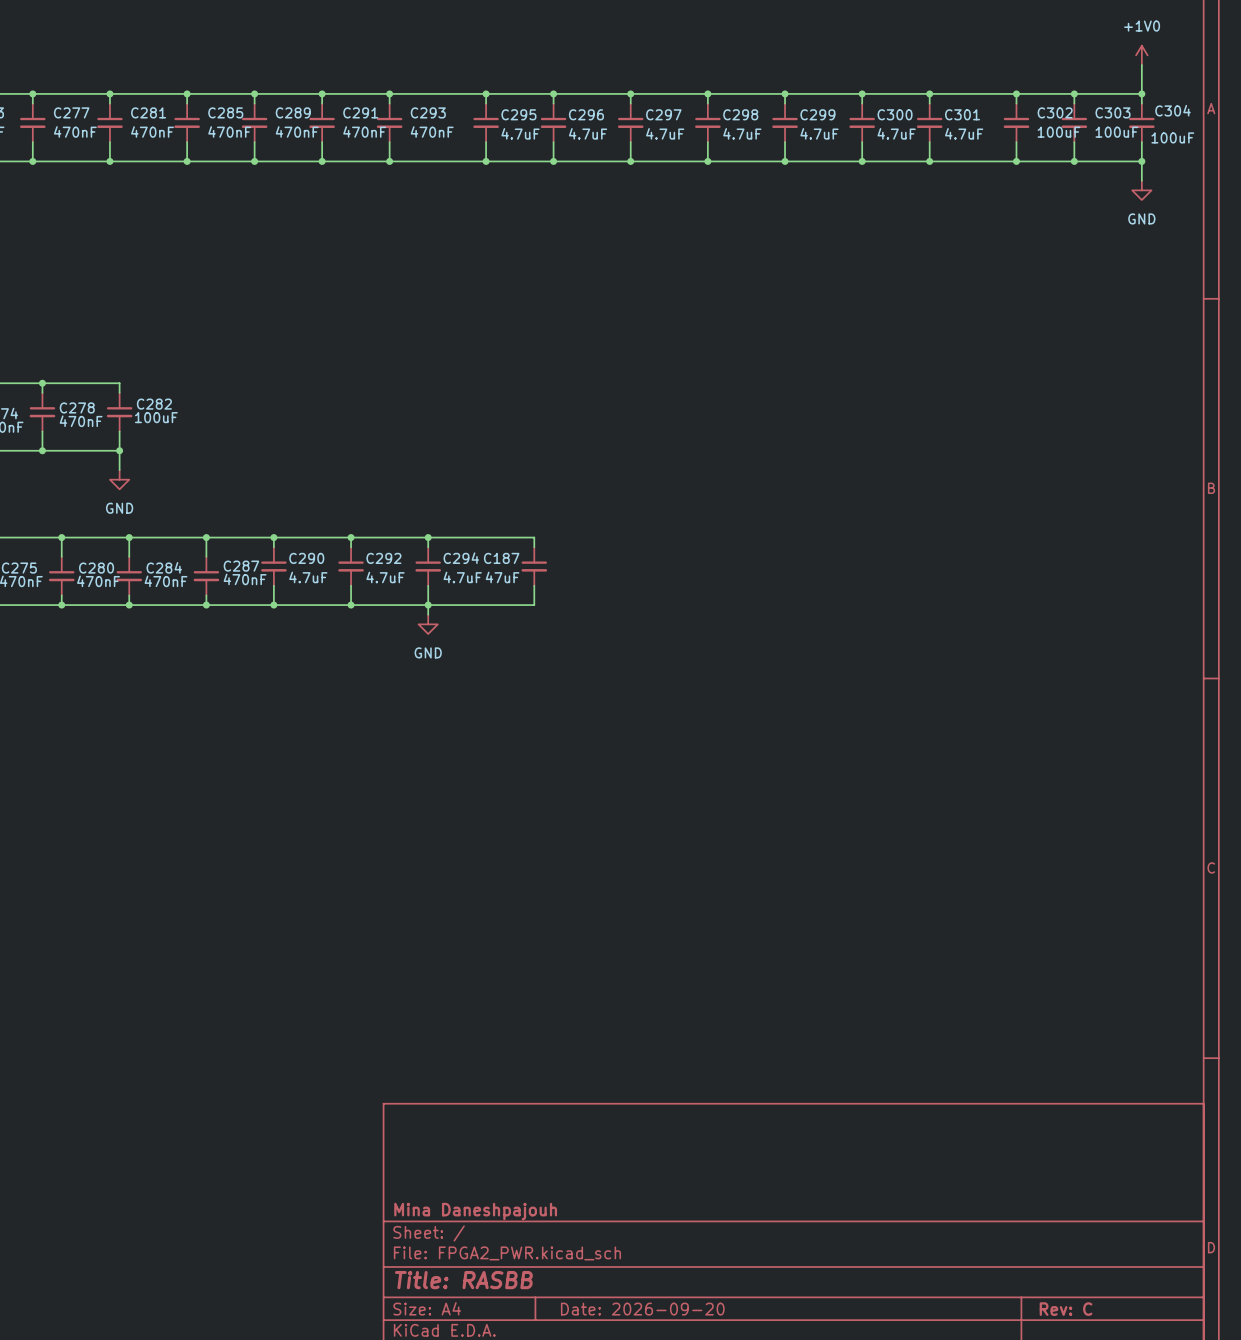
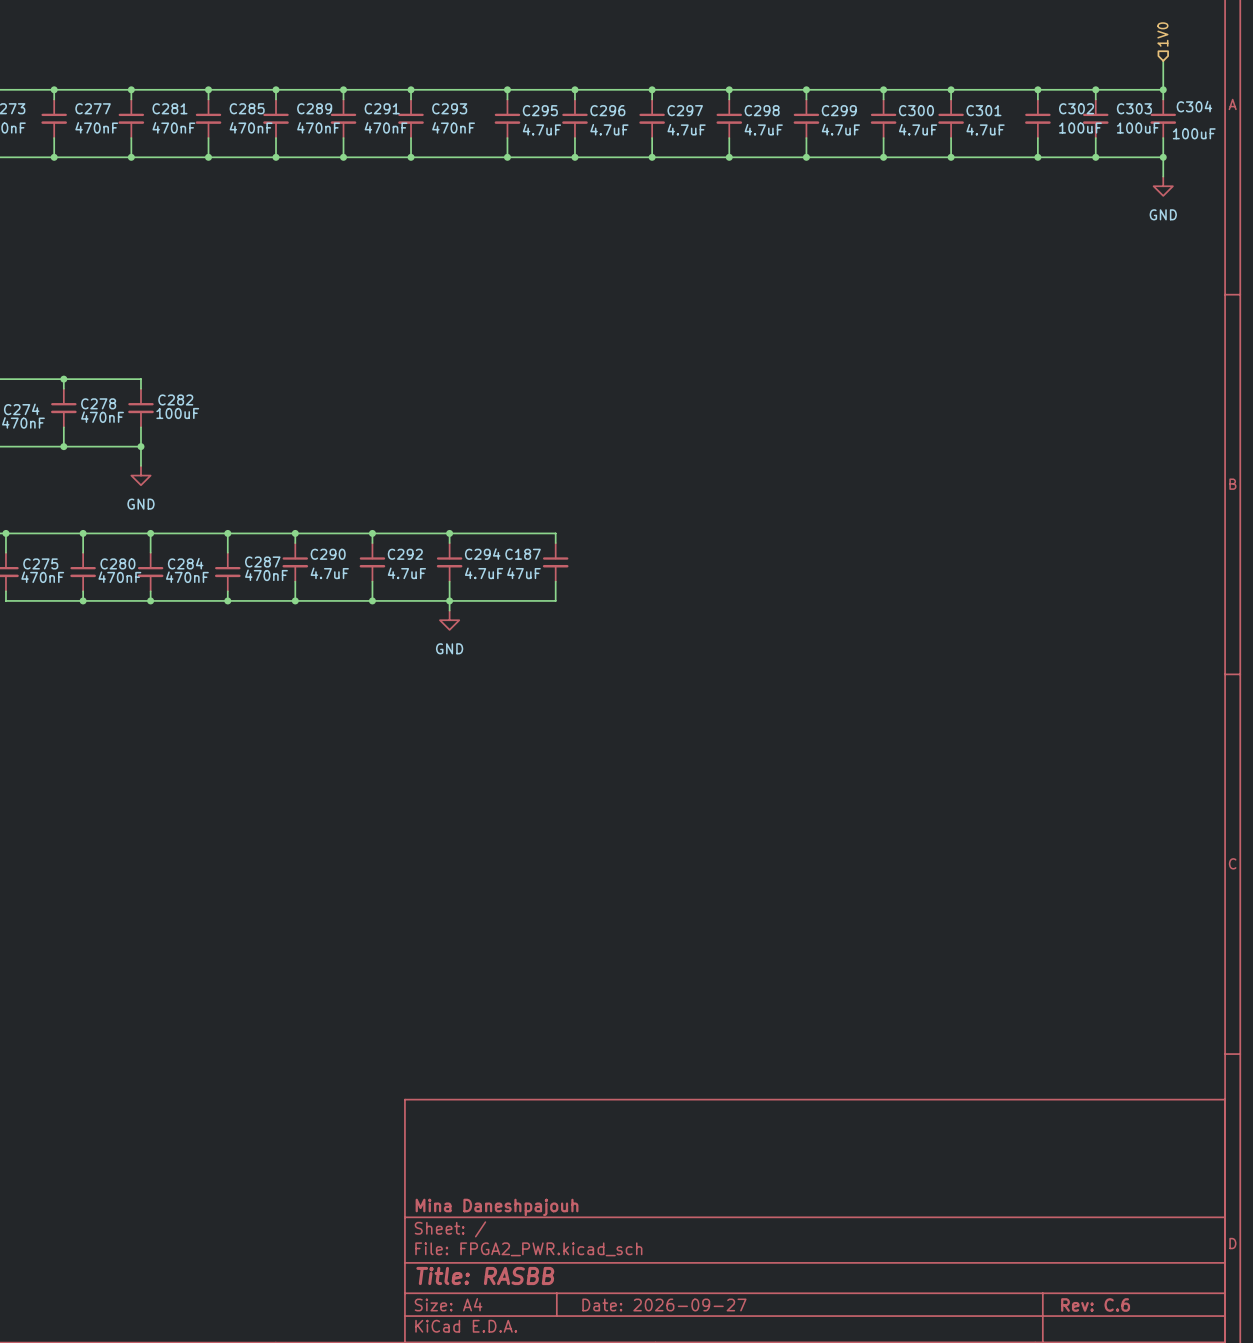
hierarchical label: none -> 1V0 (1162, 34)
power symbol: +1V0 (1141, 55) -> none
title block: Date: 2026-09-20 (642, 1309) -> Date: 2026-09-27 (664, 1304)
title block: Rev: C (1066, 1309) -> Rev: C.6 (1095, 1304)

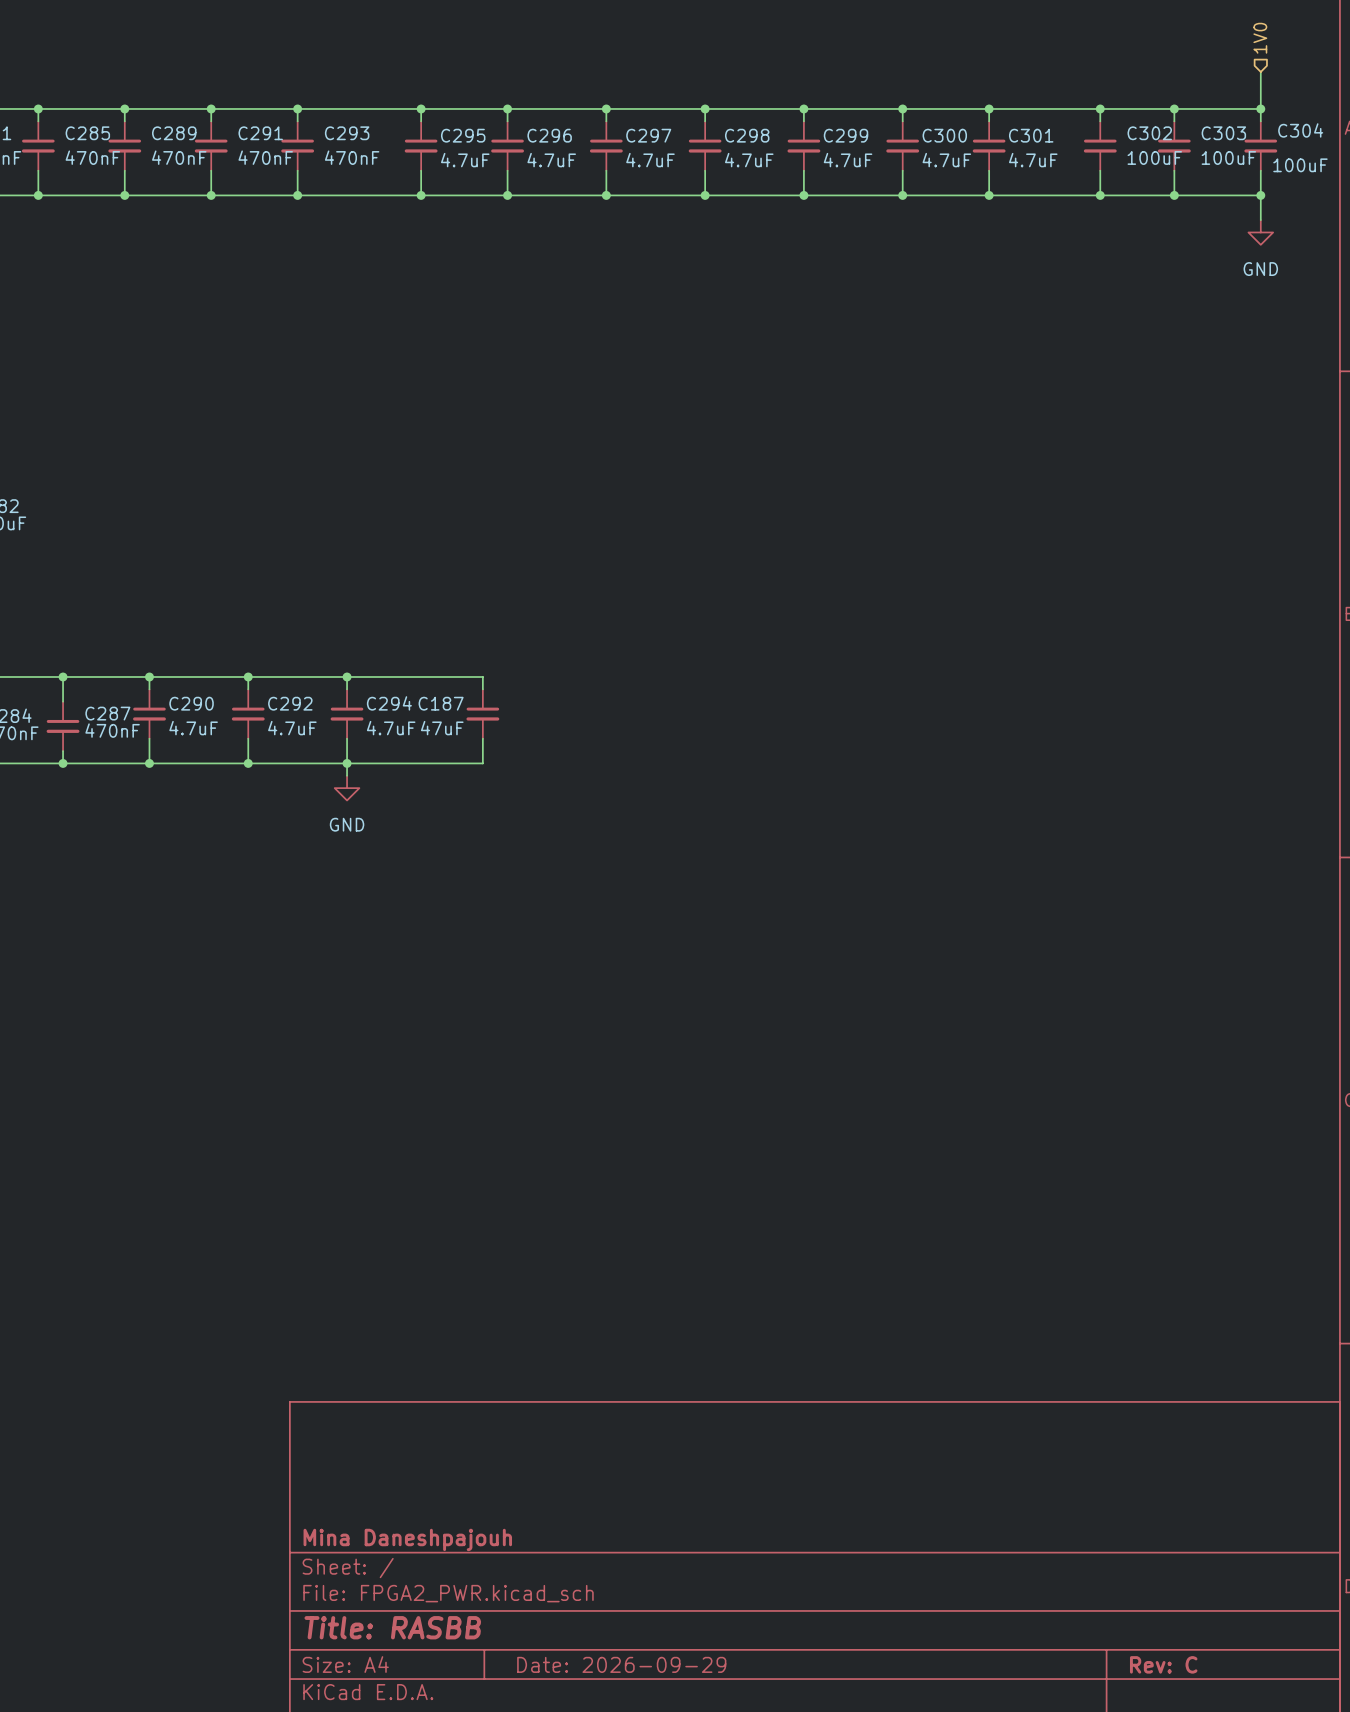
title block: Date: 2026-09-27 (664, 1304) -> Date: 2026-09-29 (621, 1664)
title block: Rev: C.6 (1095, 1304) -> Rev: C (1163, 1664)

